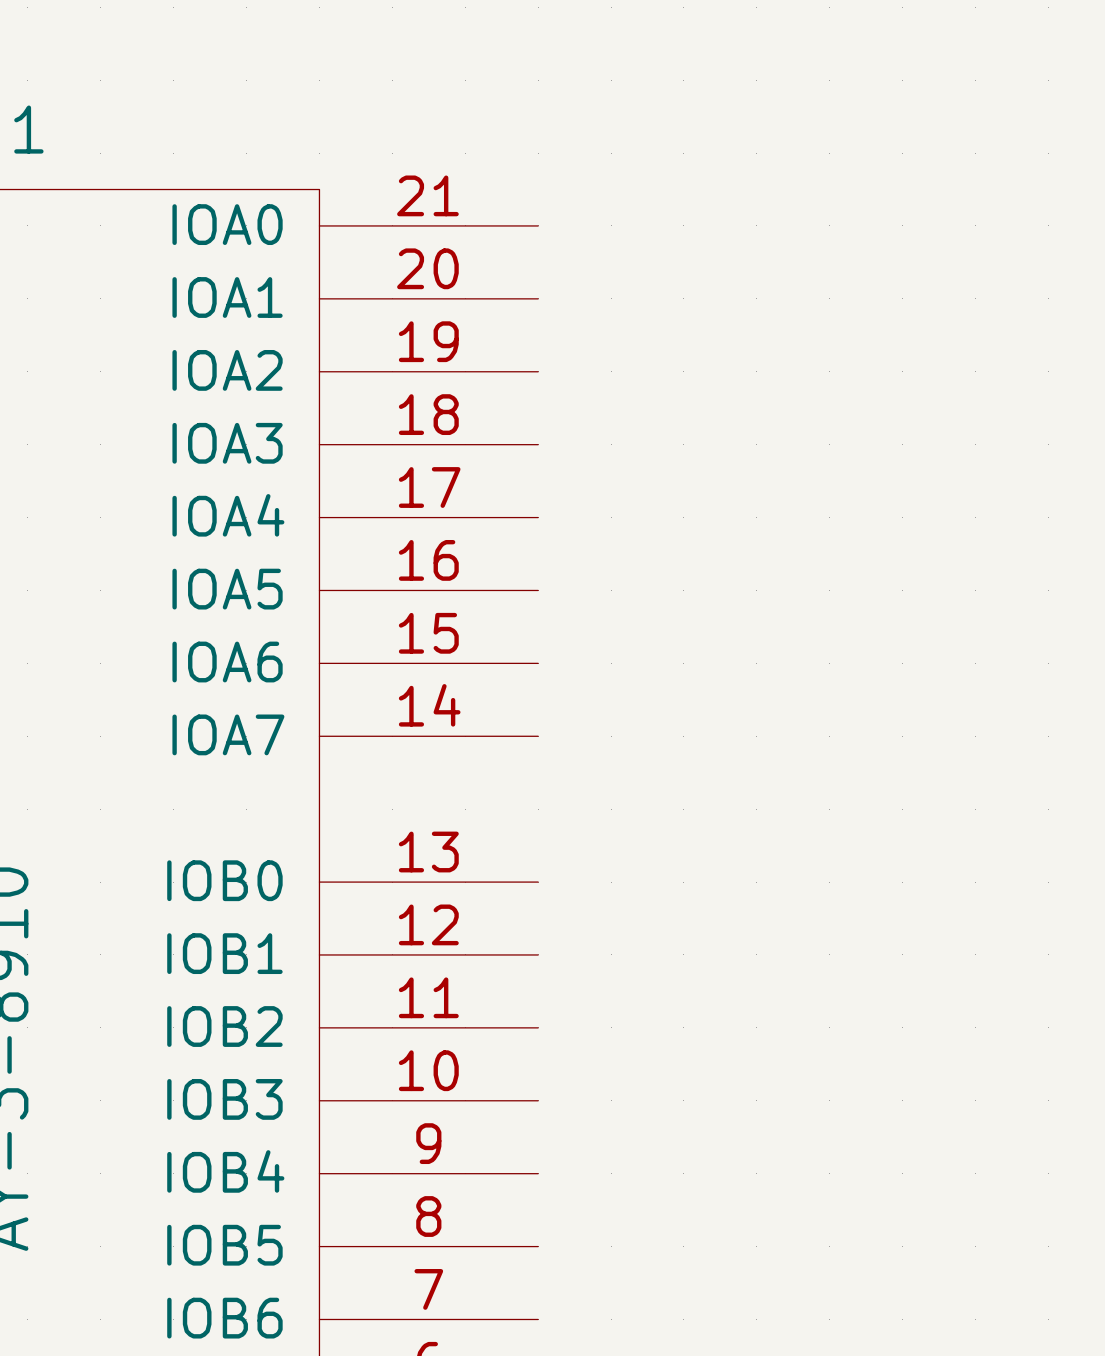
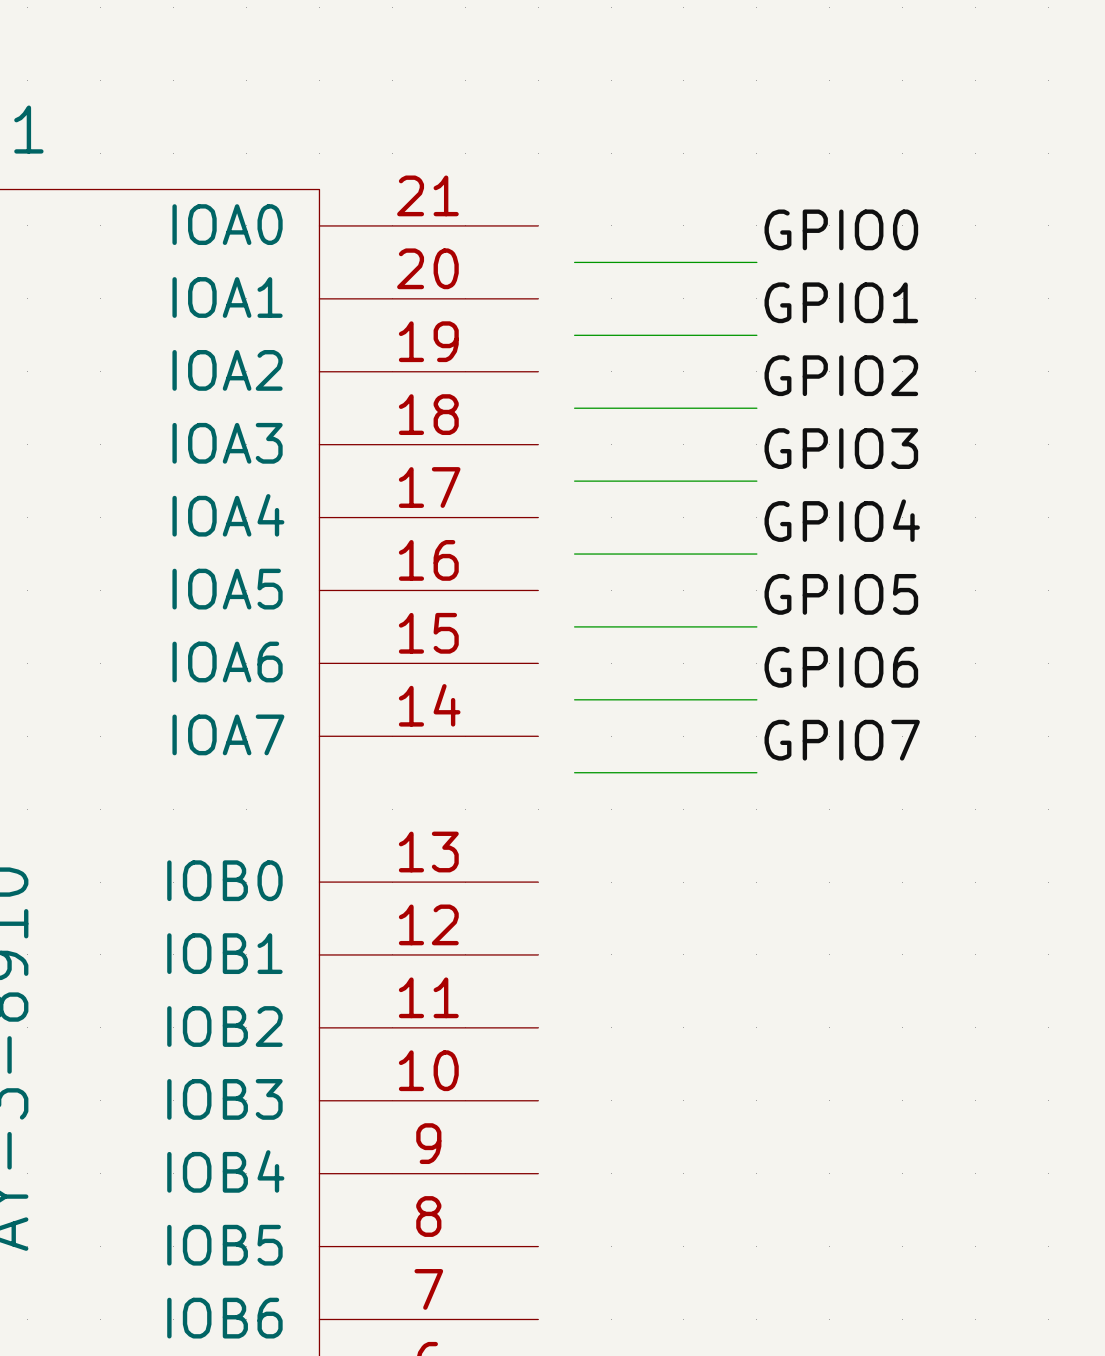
label: none -> GPIO0 (841, 229)
wire: none -> (574, 262) (756, 262)
label: none -> GPIO1 (841, 302)
wire: none -> (574, 335) (756, 335)
label: none -> GPIO2 (841, 375)
wire: none -> (574, 408) (756, 408)
label: none -> GPIO3 (841, 448)
wire: none -> (574, 481) (756, 481)
label: none -> GPIO4 (842, 520)
wire: none -> (574, 554) (756, 554)
label: none -> GPIO5 (841, 594)
wire: none -> (574, 626) (756, 626)
label: none -> GPIO6 (841, 667)
wire: none -> (574, 699) (756, 699)
label: none -> GPIO7 (842, 740)
wire: none -> (574, 772) (756, 772)

